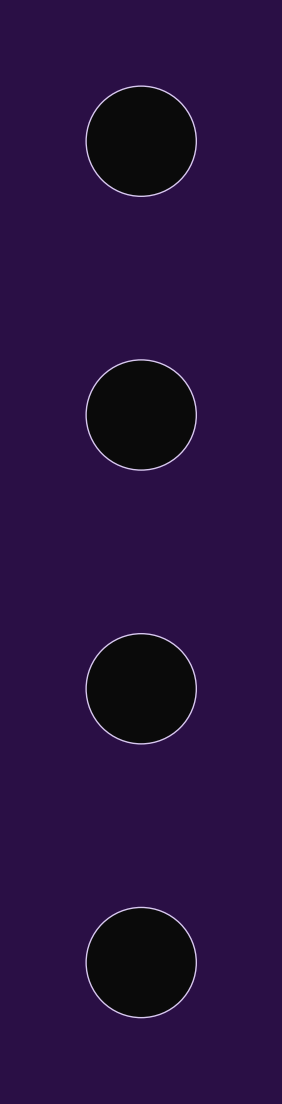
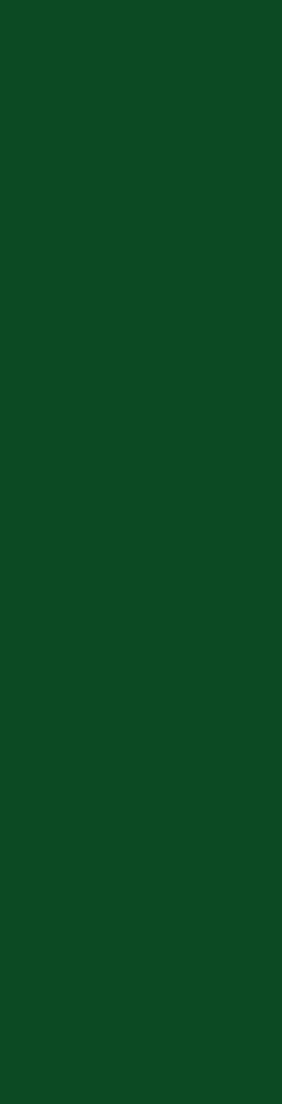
part: (141, 141) -> none
part: (141, 414) -> none
part: (141, 688) -> none
part: (141, 962) -> none

